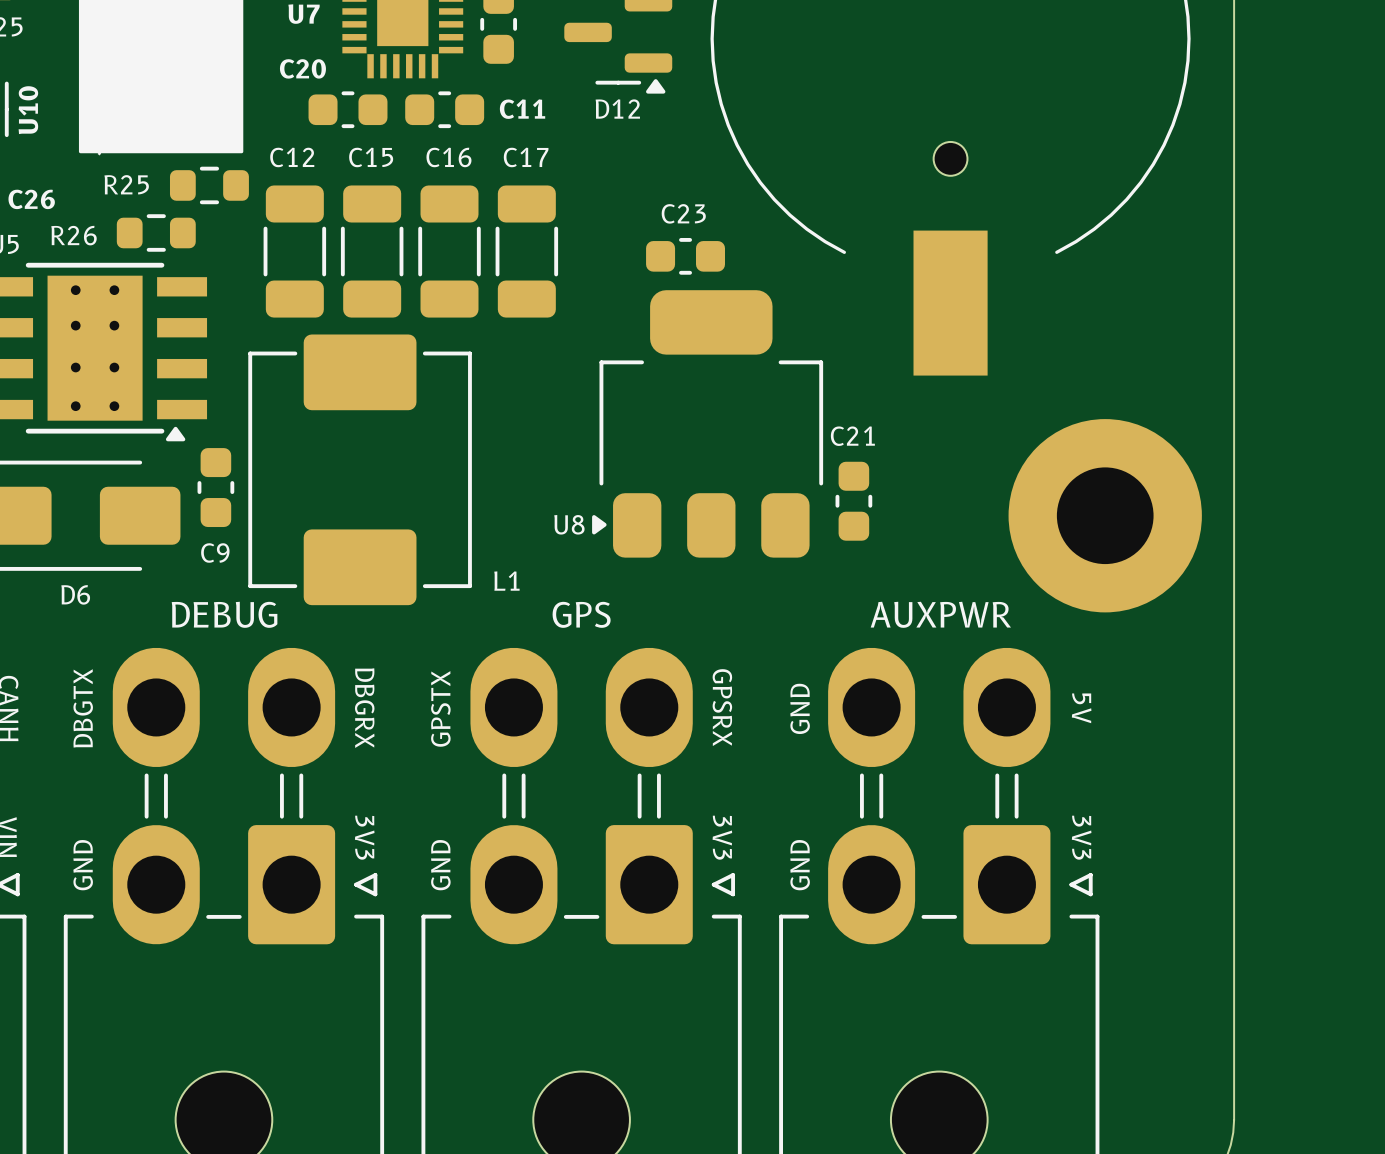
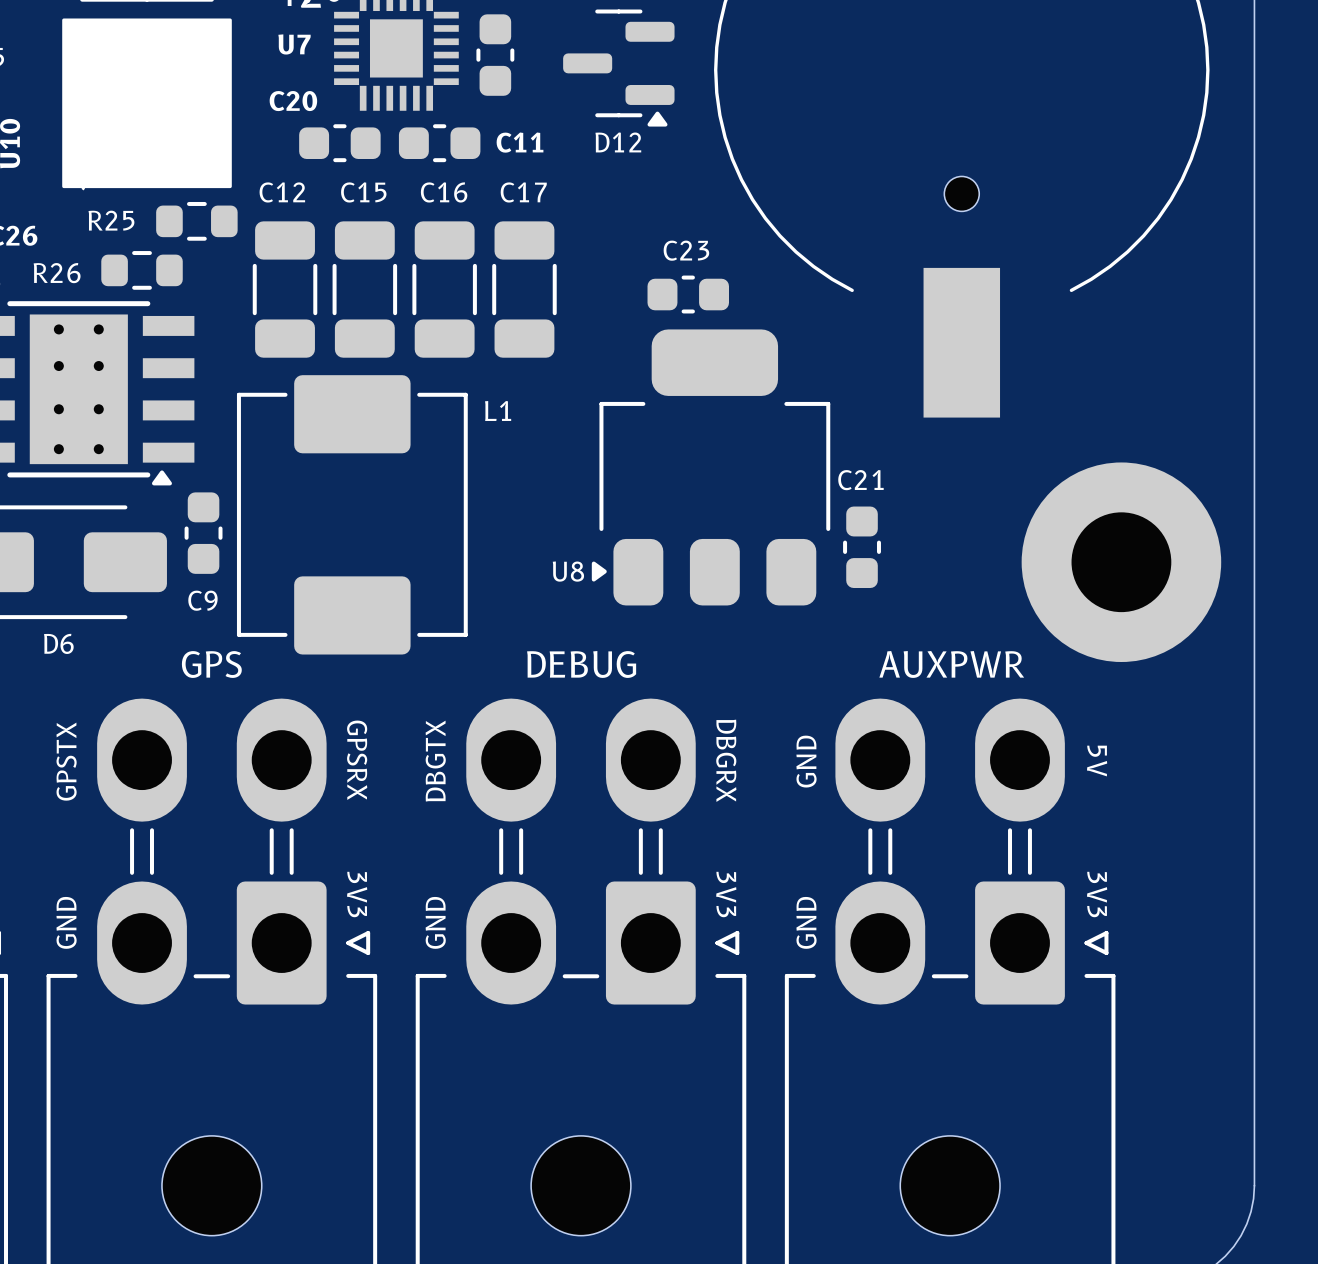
L1 name position: L1 (506, 581) -> L1 (498, 411)
text: DEBUG (224, 614) -> GPS (211, 664)
text: GPS (581, 614) -> DEBUG (581, 664)
text: GPSRX (722, 707) -> DBGRX (726, 760)
text: DBGTX (83, 708) -> GPSTX (66, 761)
text: DBGRX (364, 708) -> GPSRX (357, 760)
text: GPSTX (440, 708) -> DBGTX (435, 761)

